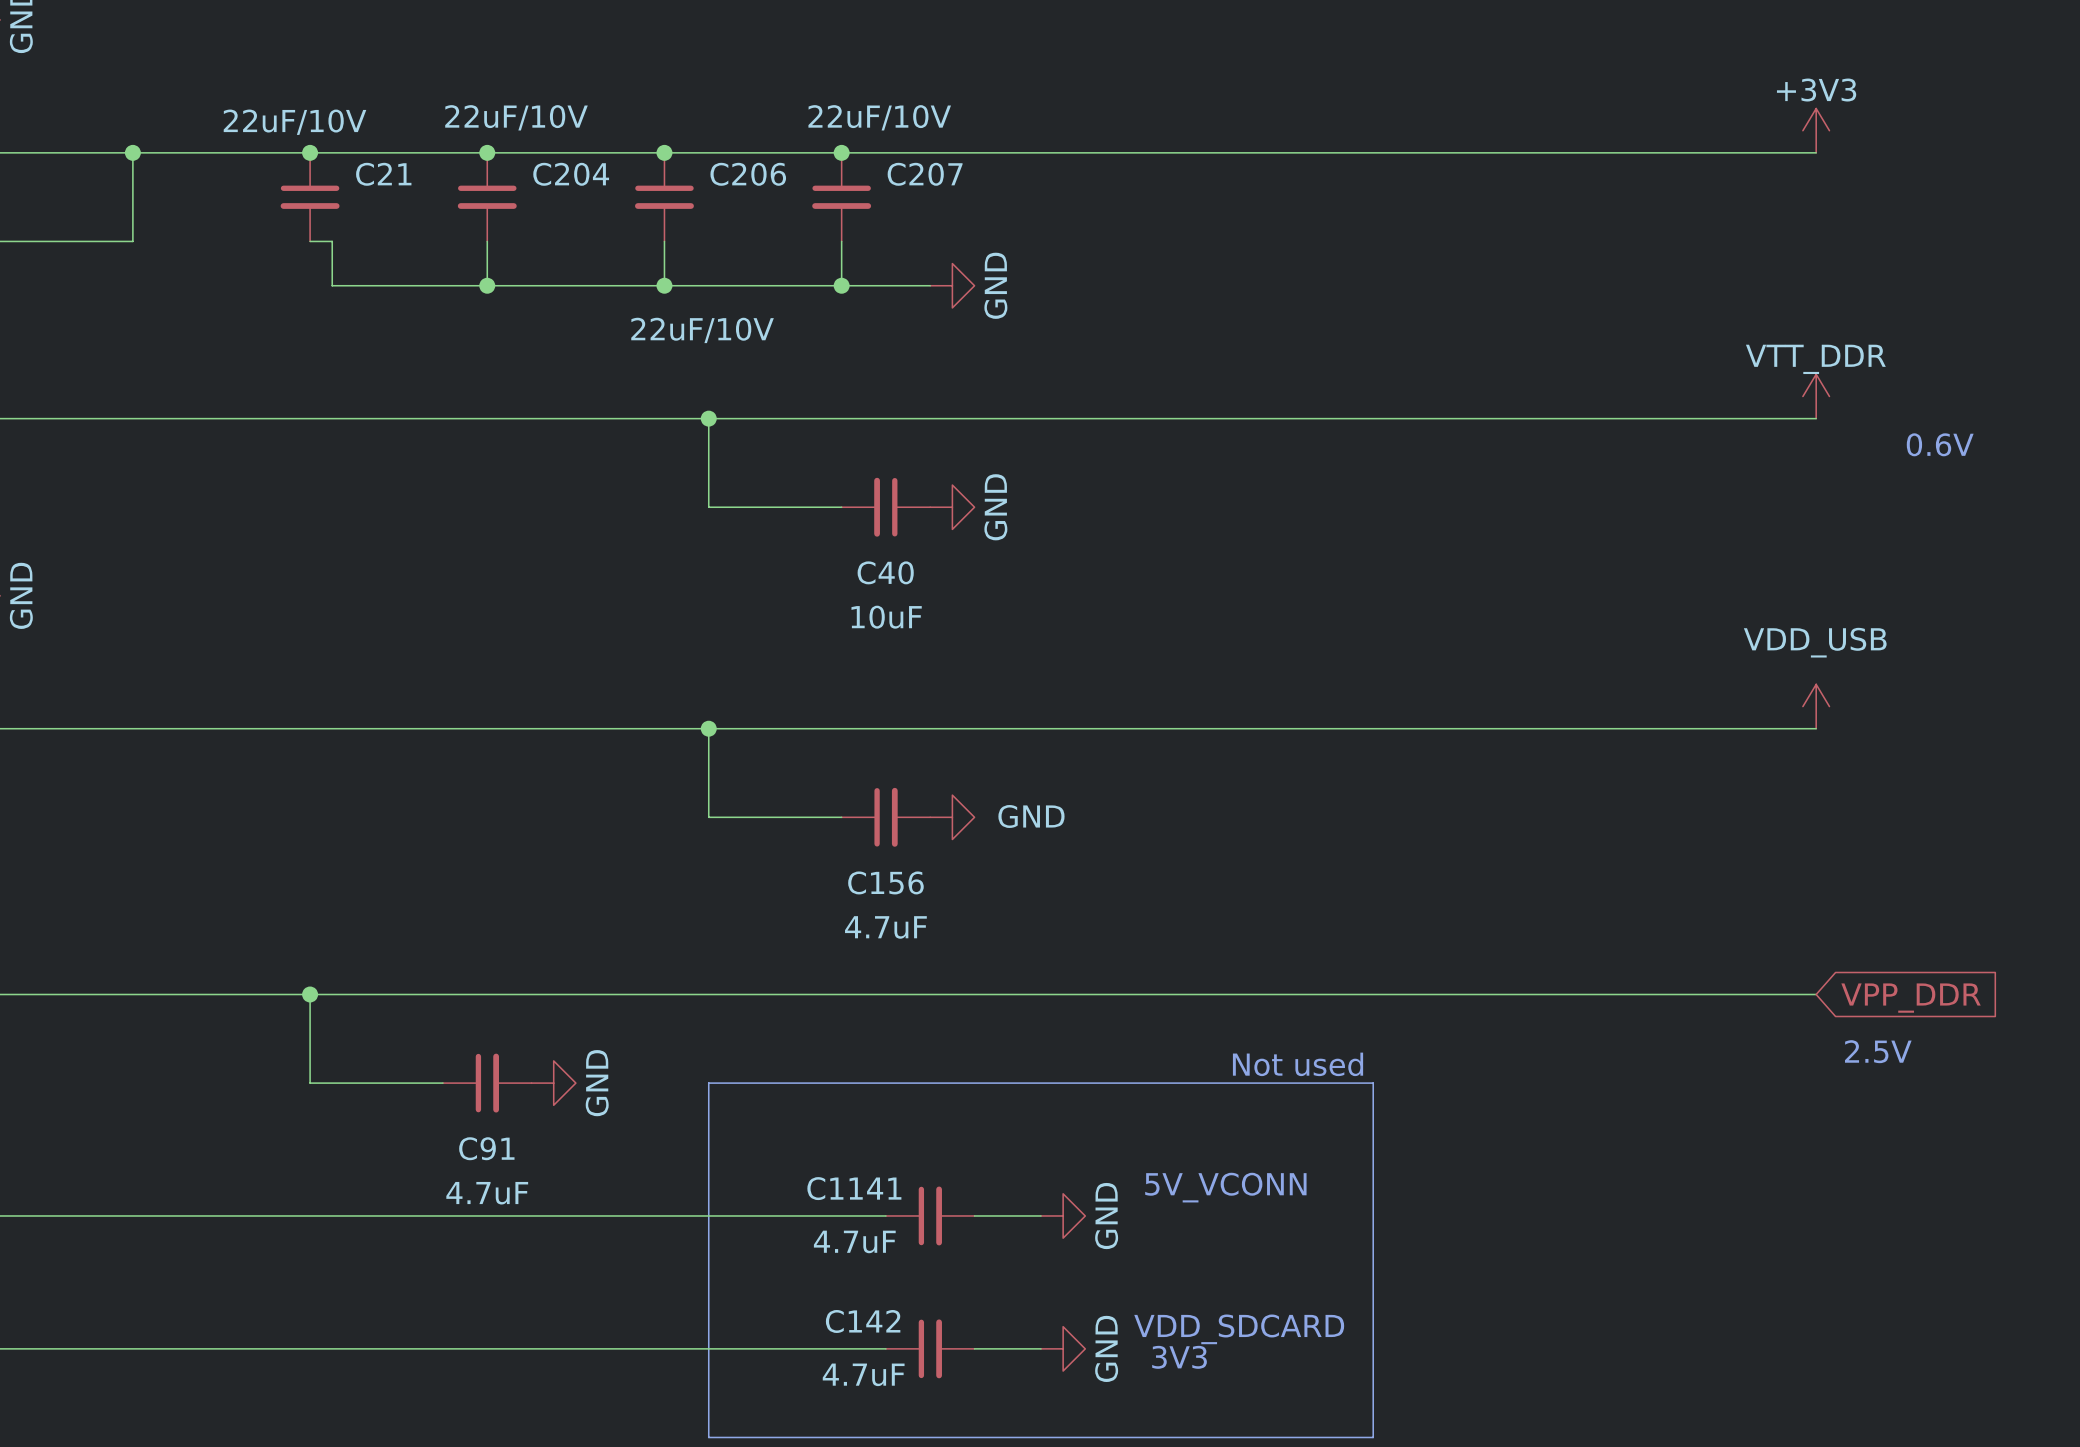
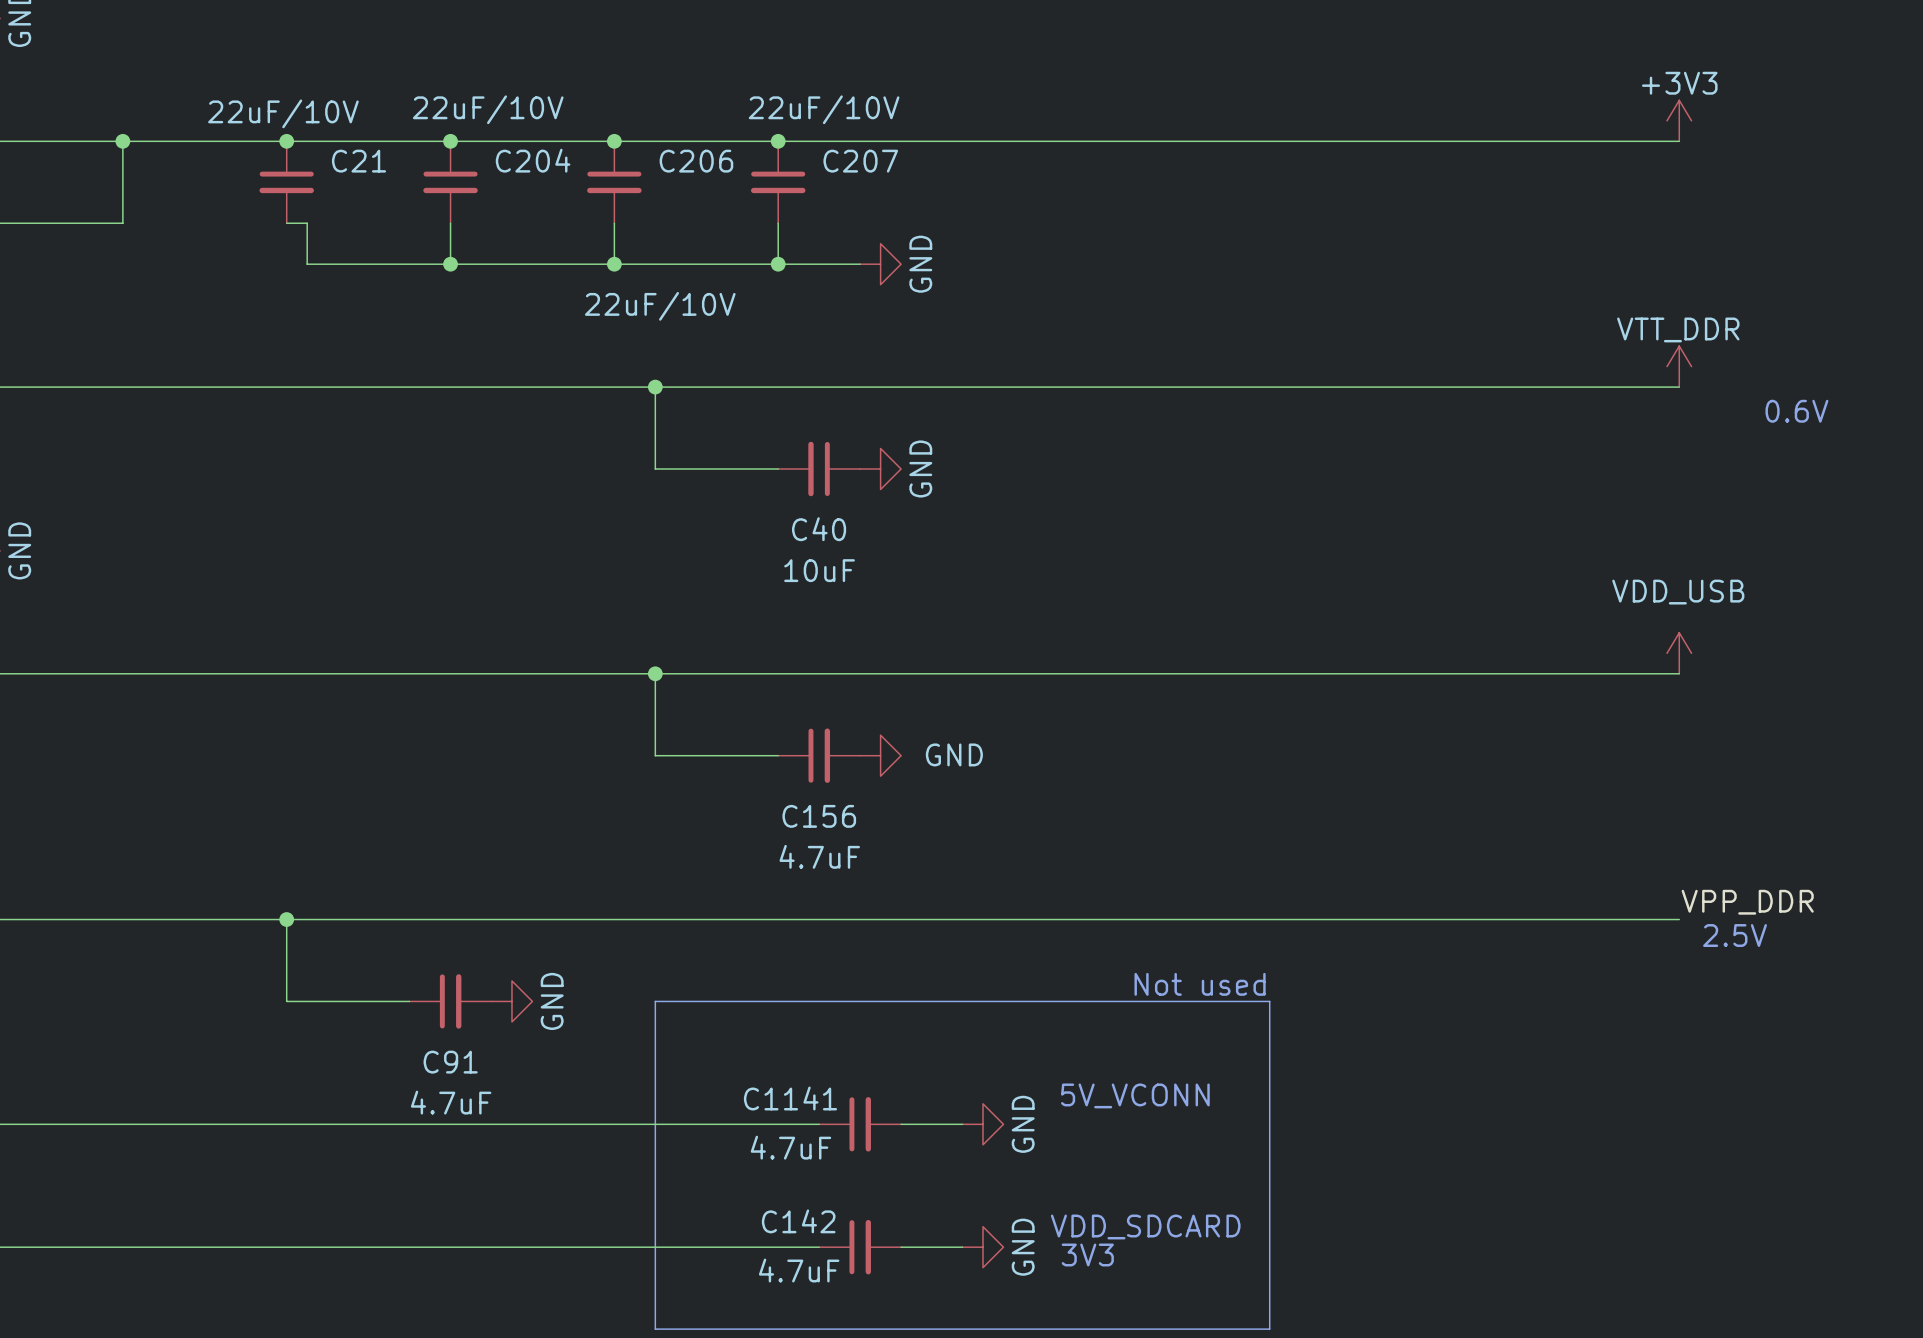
label: none -> VPP_DDR (1747, 902)
global label: VPP_DDR (1911, 998) -> none
text position: 2.5V (1878, 1051) -> 2.5V (1735, 935)

